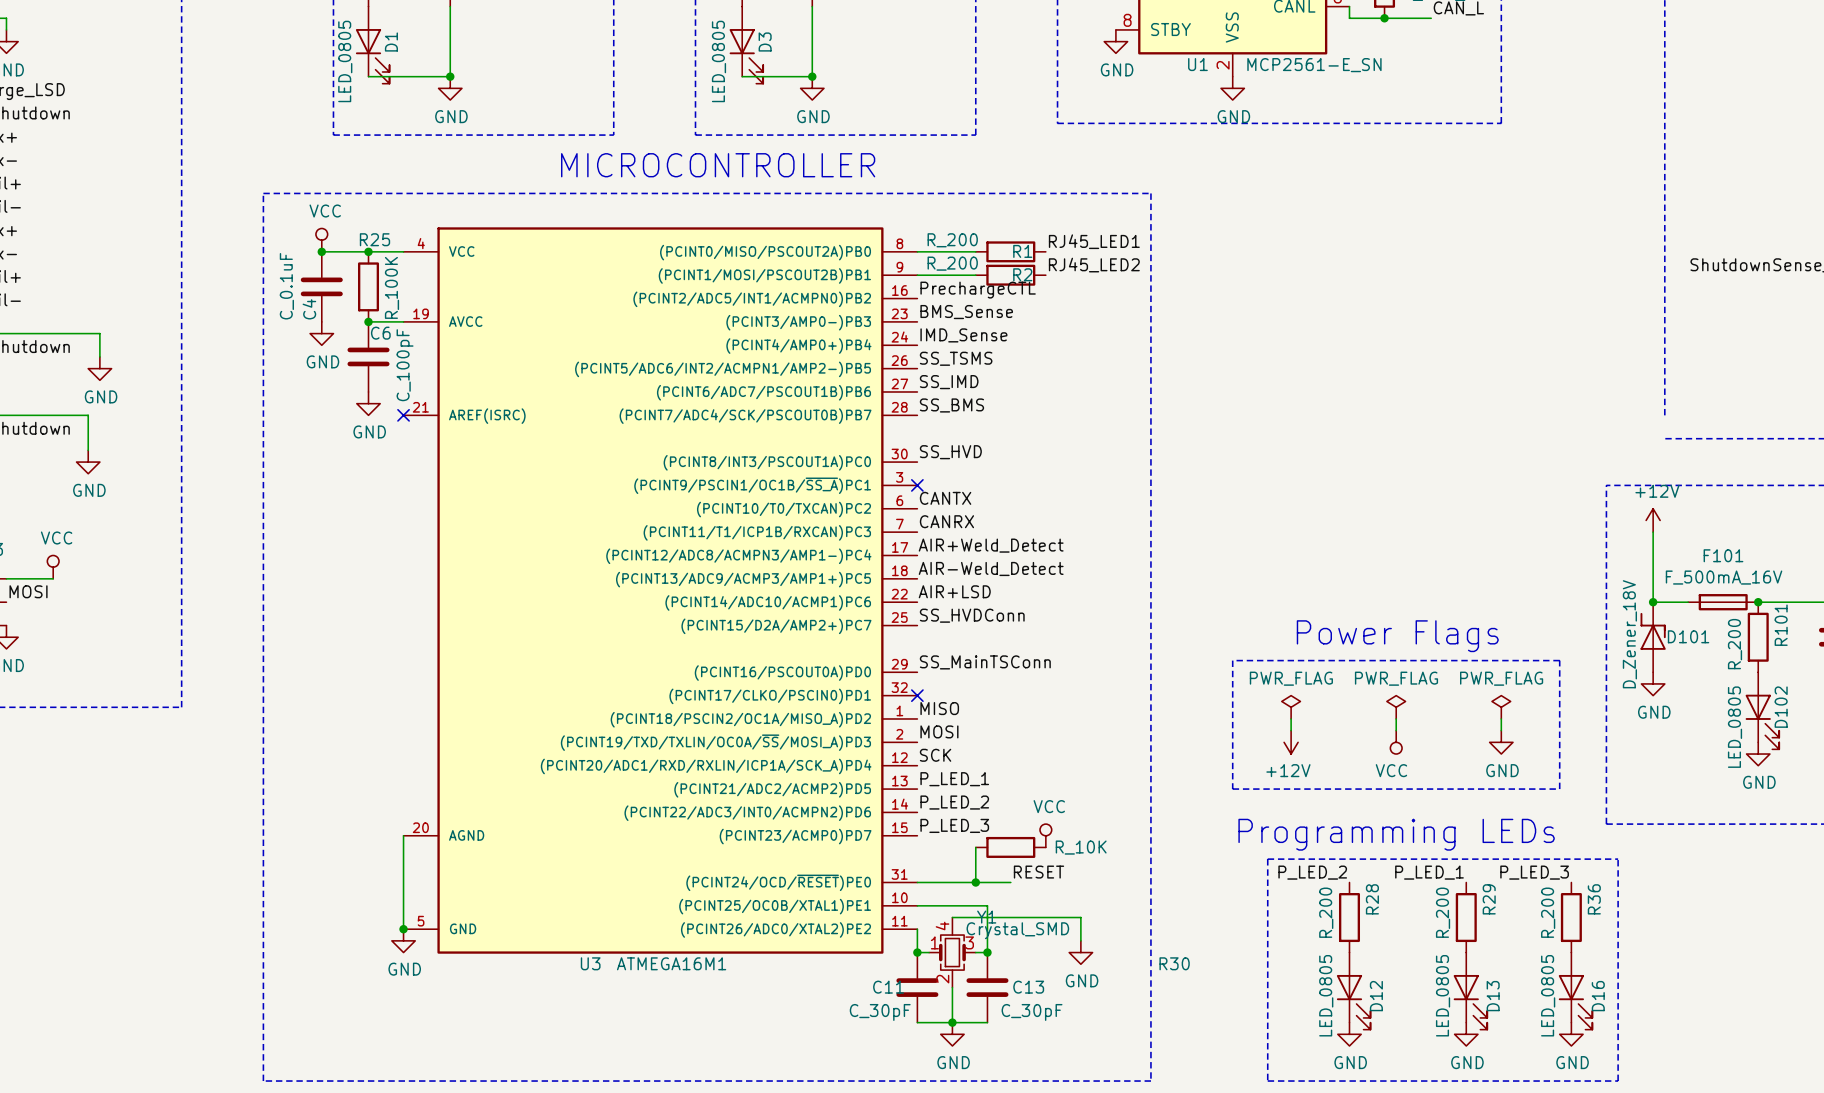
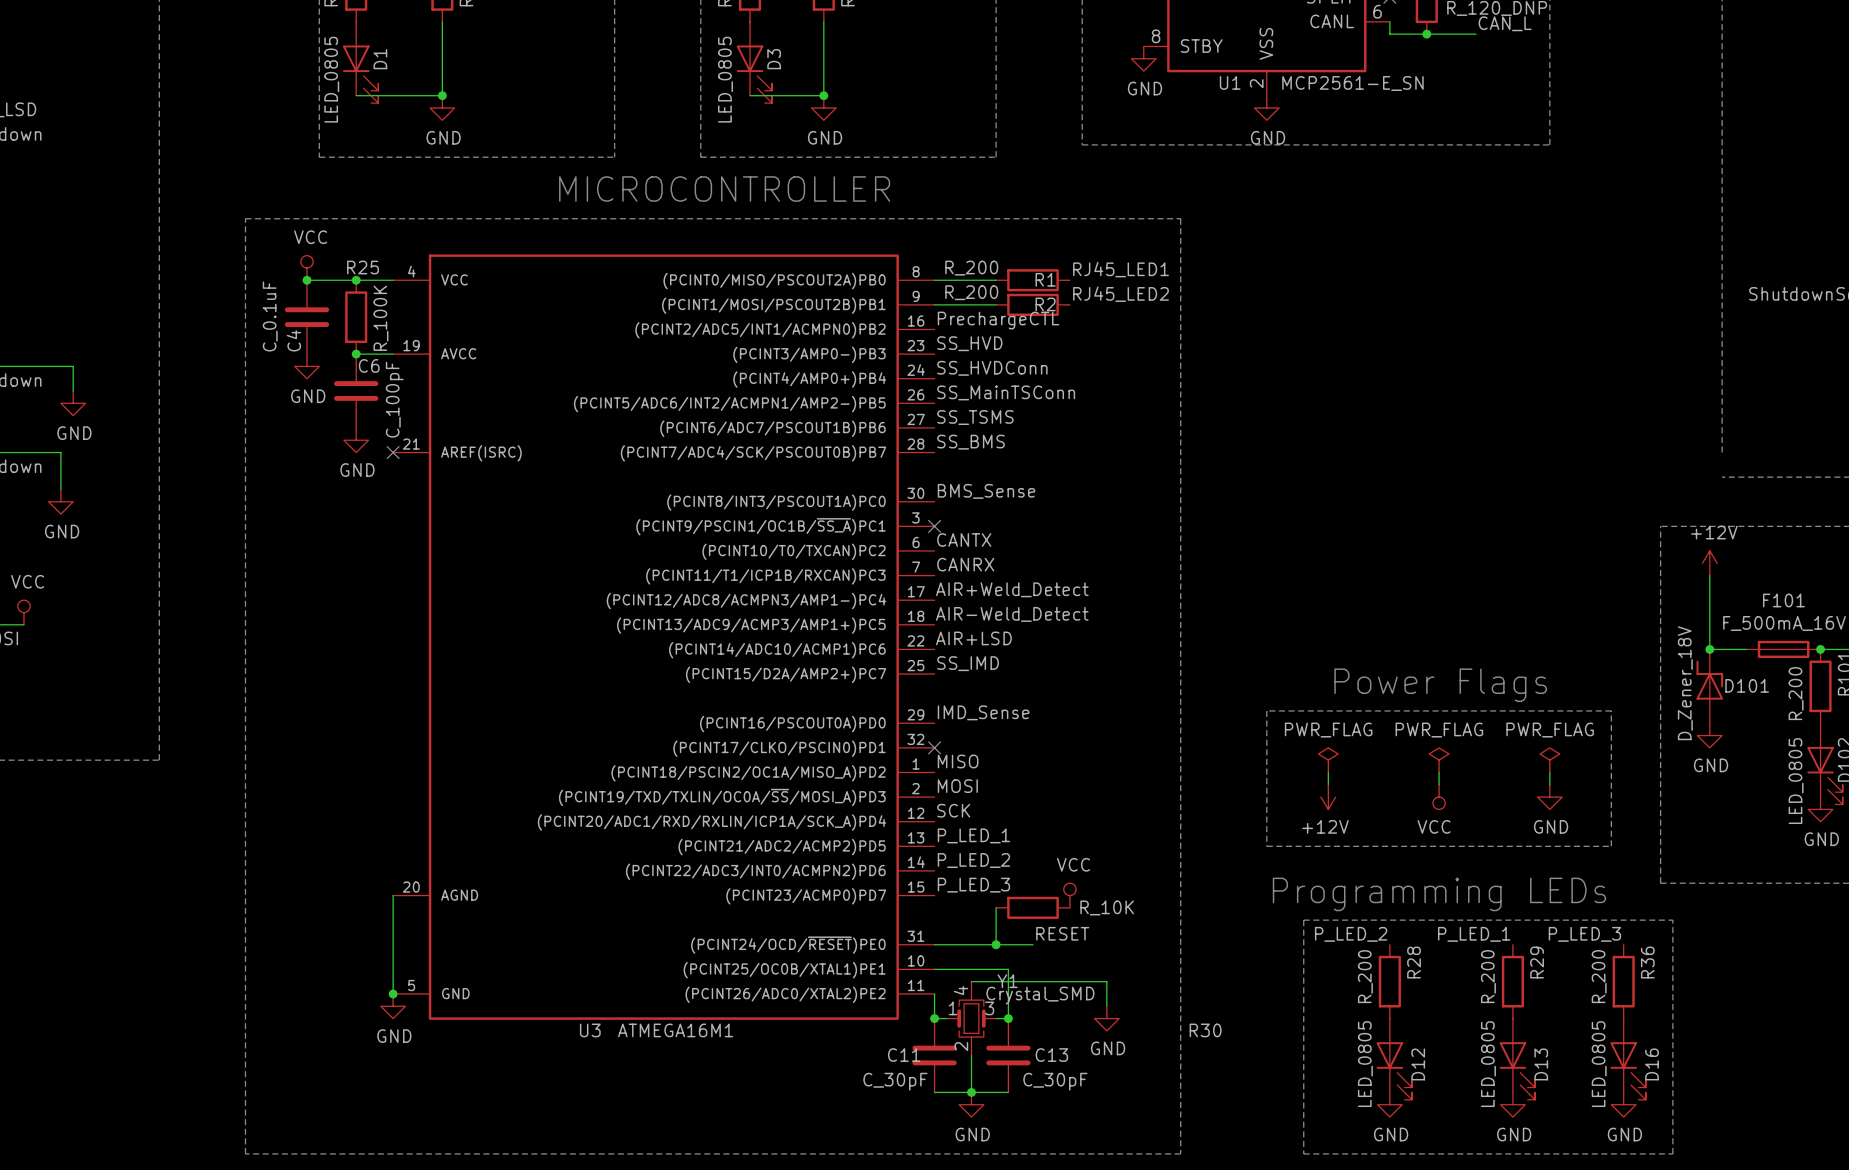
label: BMS_Sense (966, 312) -> SS_HVD (969, 343)
label: IMD_Sense (963, 335) -> SS_HVDConn (992, 368)
label: SS_TSMS (956, 358) -> SS_MainTSConn (1006, 392)
label: SS_IMD (949, 382) -> SS_TSMS (975, 417)
label: SS_HVD (950, 452) -> BMS_Sense (986, 491)
label: SS_HVDConn (972, 615) -> SS_IMD (968, 663)
label: SS_MainTSConn (985, 662) -> IMD_Sense (983, 712)

